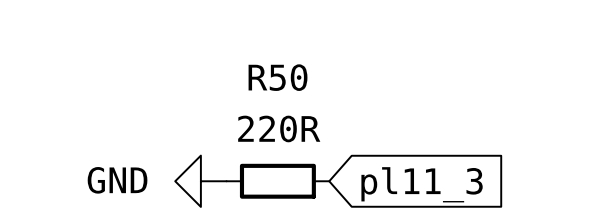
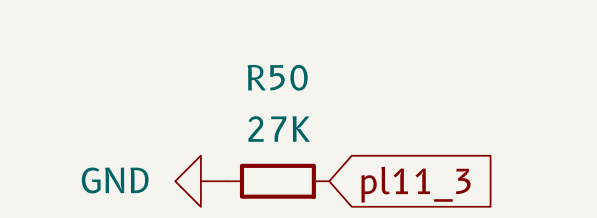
R50 value: 220R (279, 128) -> 27K (279, 128)

